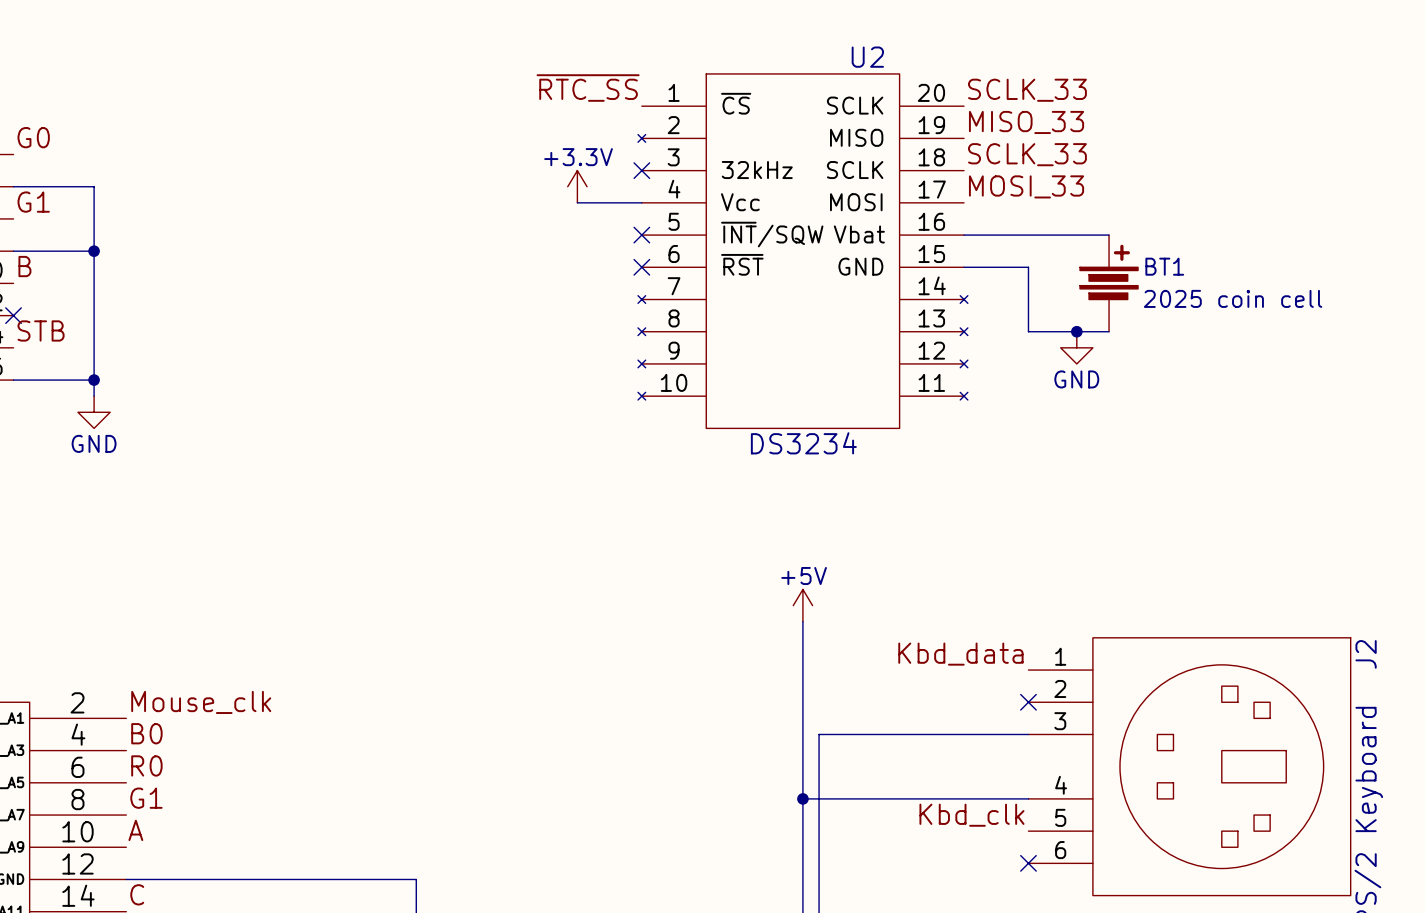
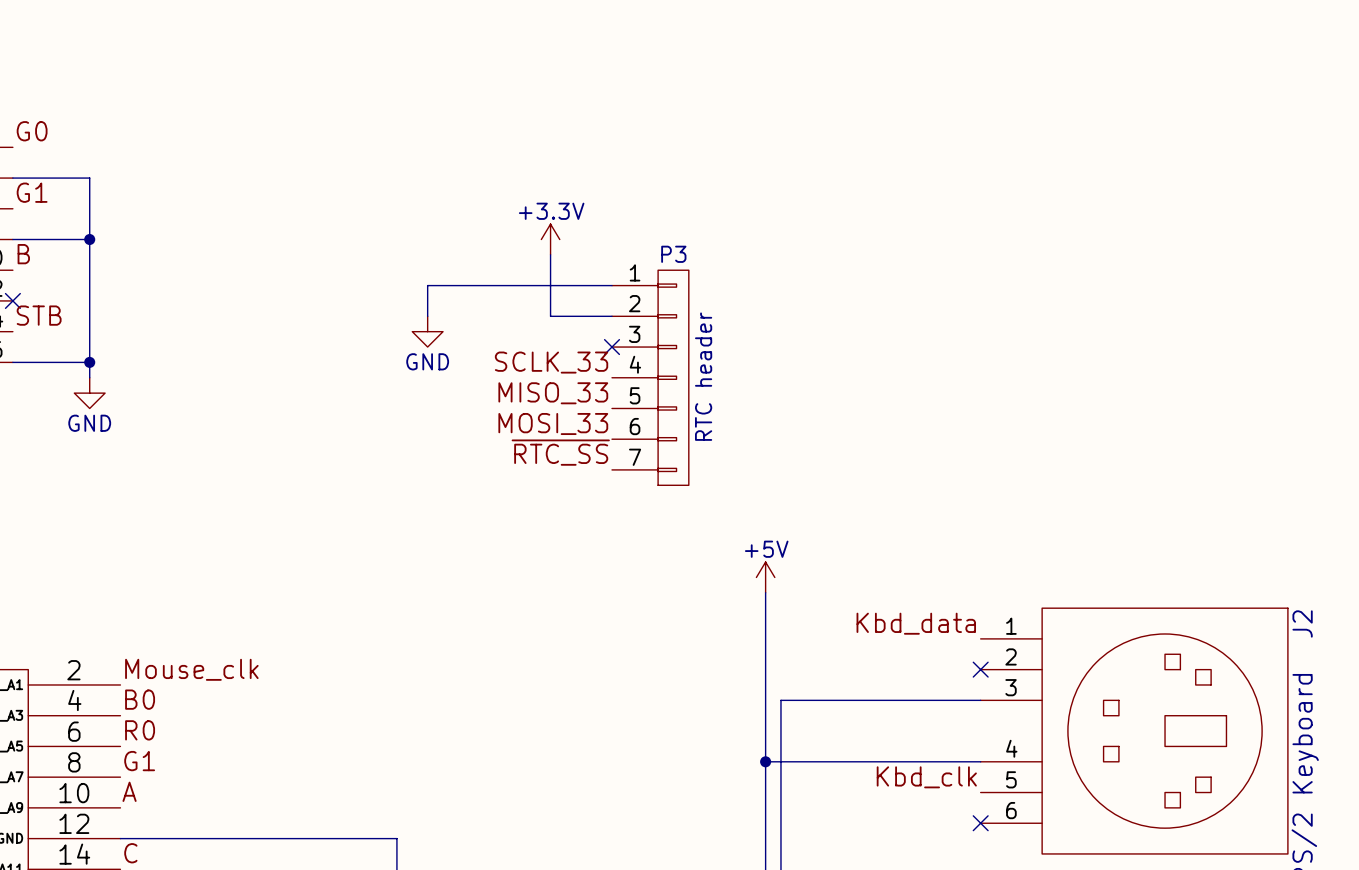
label: ~{RTC_SS} (588, 88) -> none
label: SCLK_33 (1027, 90) -> none
label: MISO_33 (1026, 122) -> none
label: SCLK_33 (1027, 154) -> none
no-connect mark: (641, 170) -> none
power symbol position: +3.3V (577, 186) -> +3.3V (550, 239)
label: MOSI_33 (1026, 186) -> none
wire: (577, 202) (641, 202) -> none
no-connect mark: (641, 235) -> none
wire: (964, 235) (1109, 235) -> none
U2: DS3234 (802, 251) -> none
wire: none -> (550, 254) (550, 316) (612, 316)
no-connect mark: (641, 267) -> none
wire: (964, 267) (1028, 267) (1028, 331) (1109, 331) -> none
BT1: 2025 coin cell (1109, 283) -> none
wire: none -> (612, 285) (427, 285) (427, 316)
junction: (1076, 331) -> none
power symbol: none -> GND (427, 331)
power symbol: GND (1076, 347) -> none
no-connect mark: none -> (612, 347)
label: none -> SCLK_33 (551, 362)
P3: none -> RTC header (650, 377)
label: none -> MISO_33 (553, 393)
label: none -> MOSI_33 (553, 424)
label: none -> ~{RTC_SS} (560, 452)

